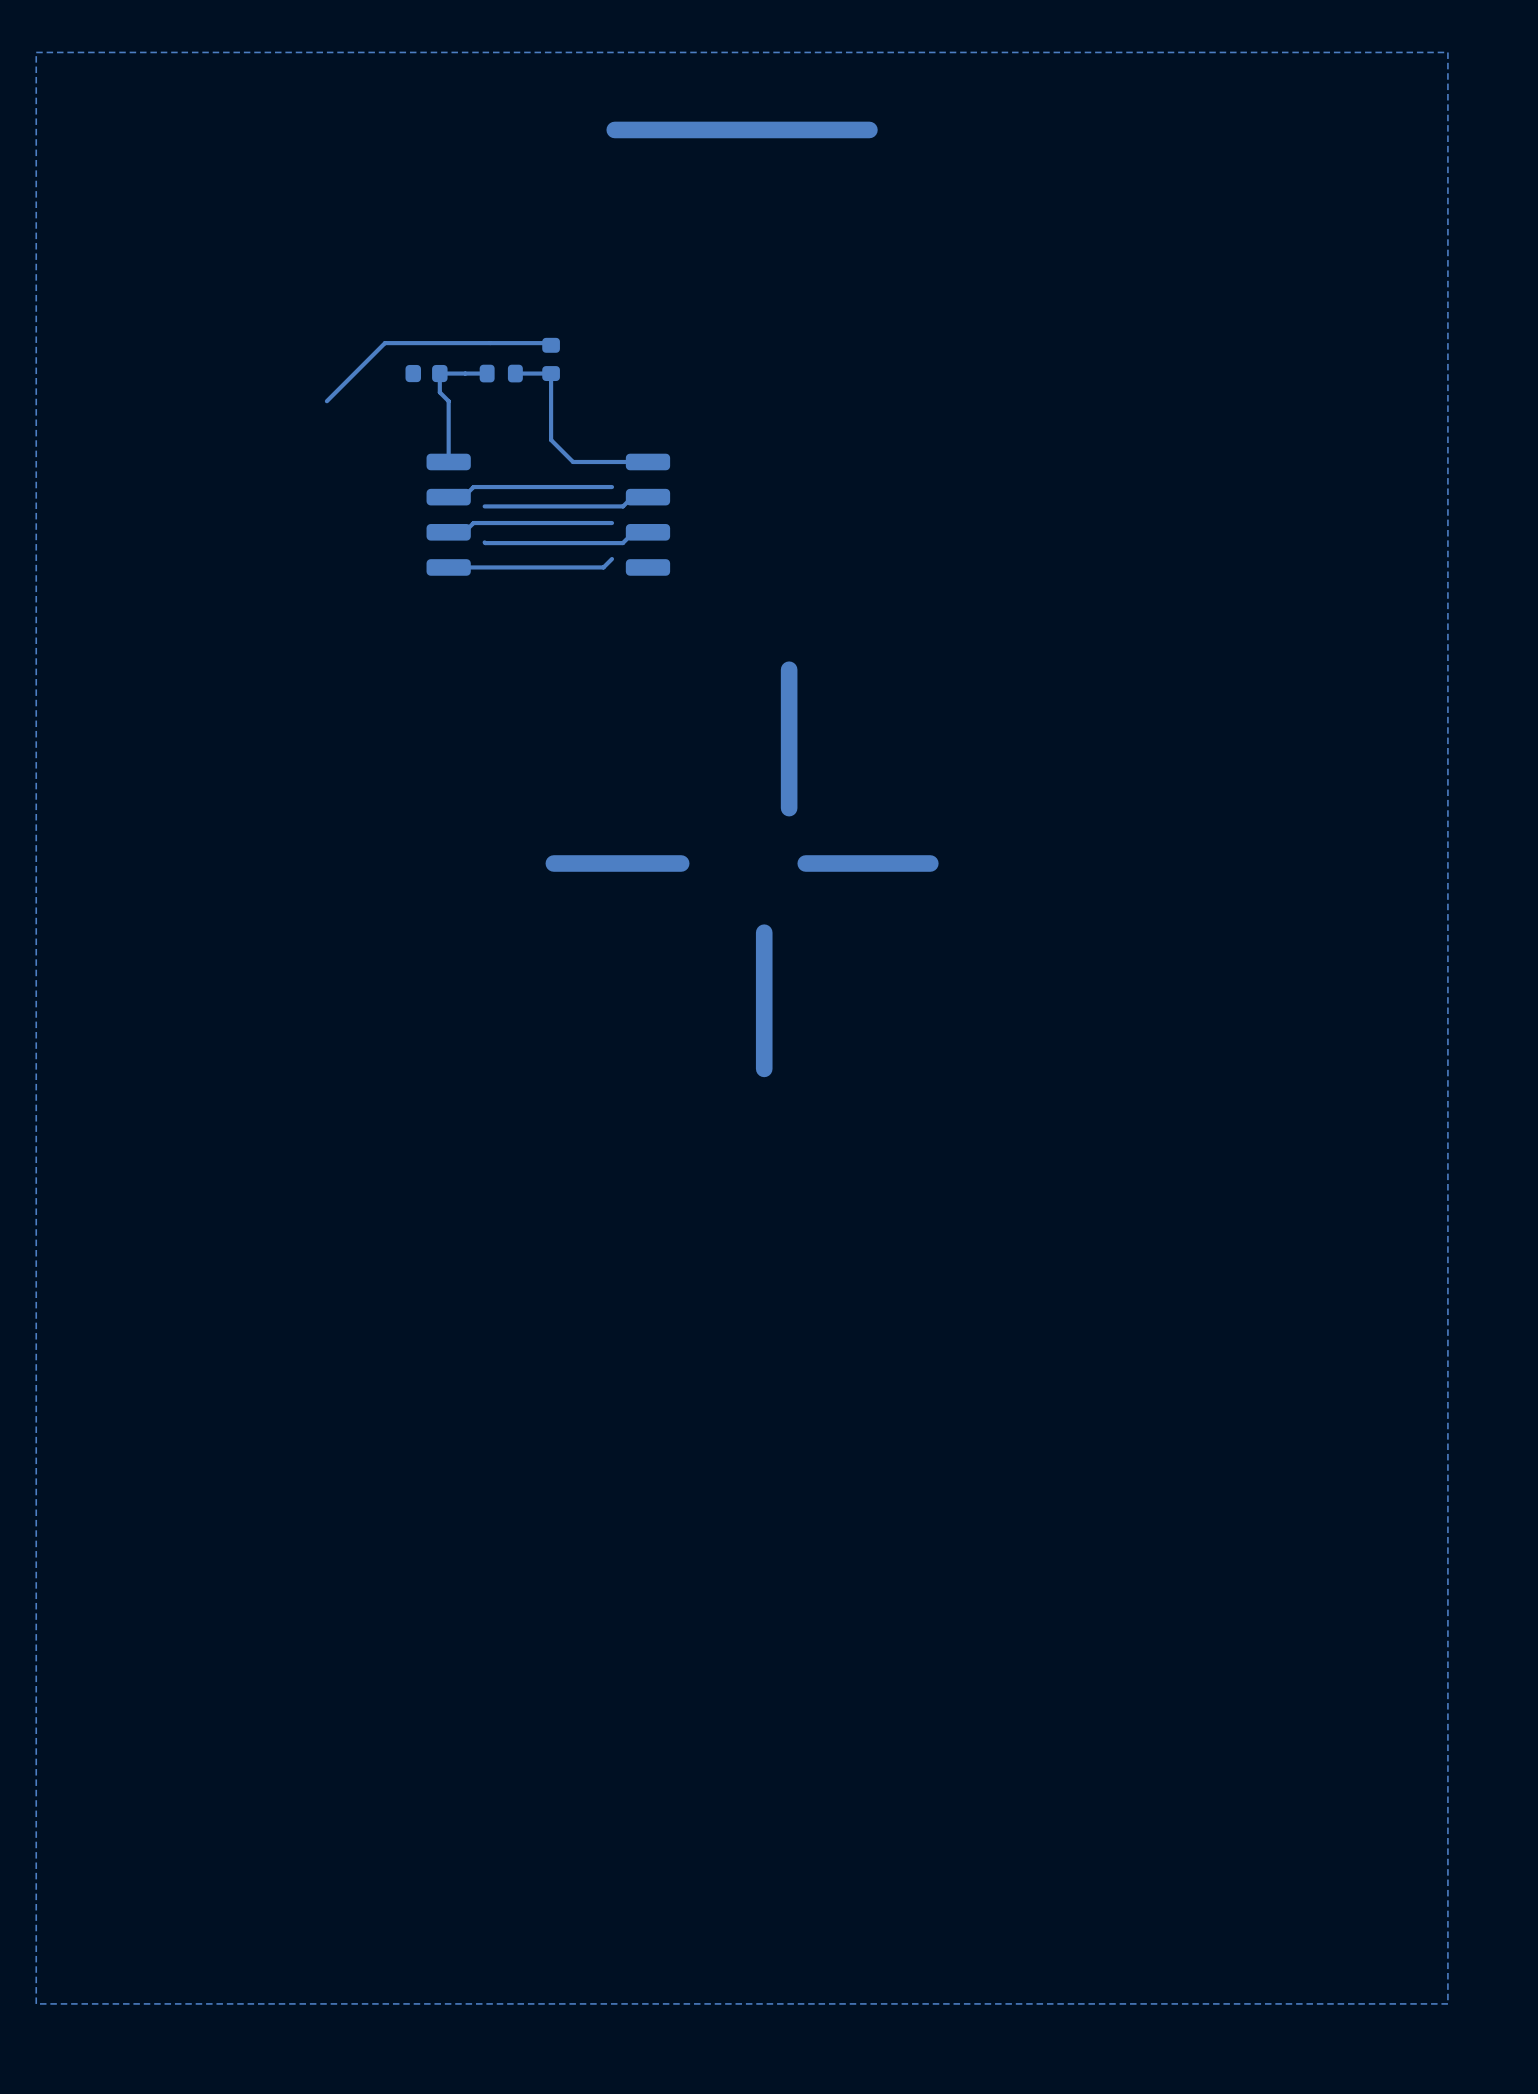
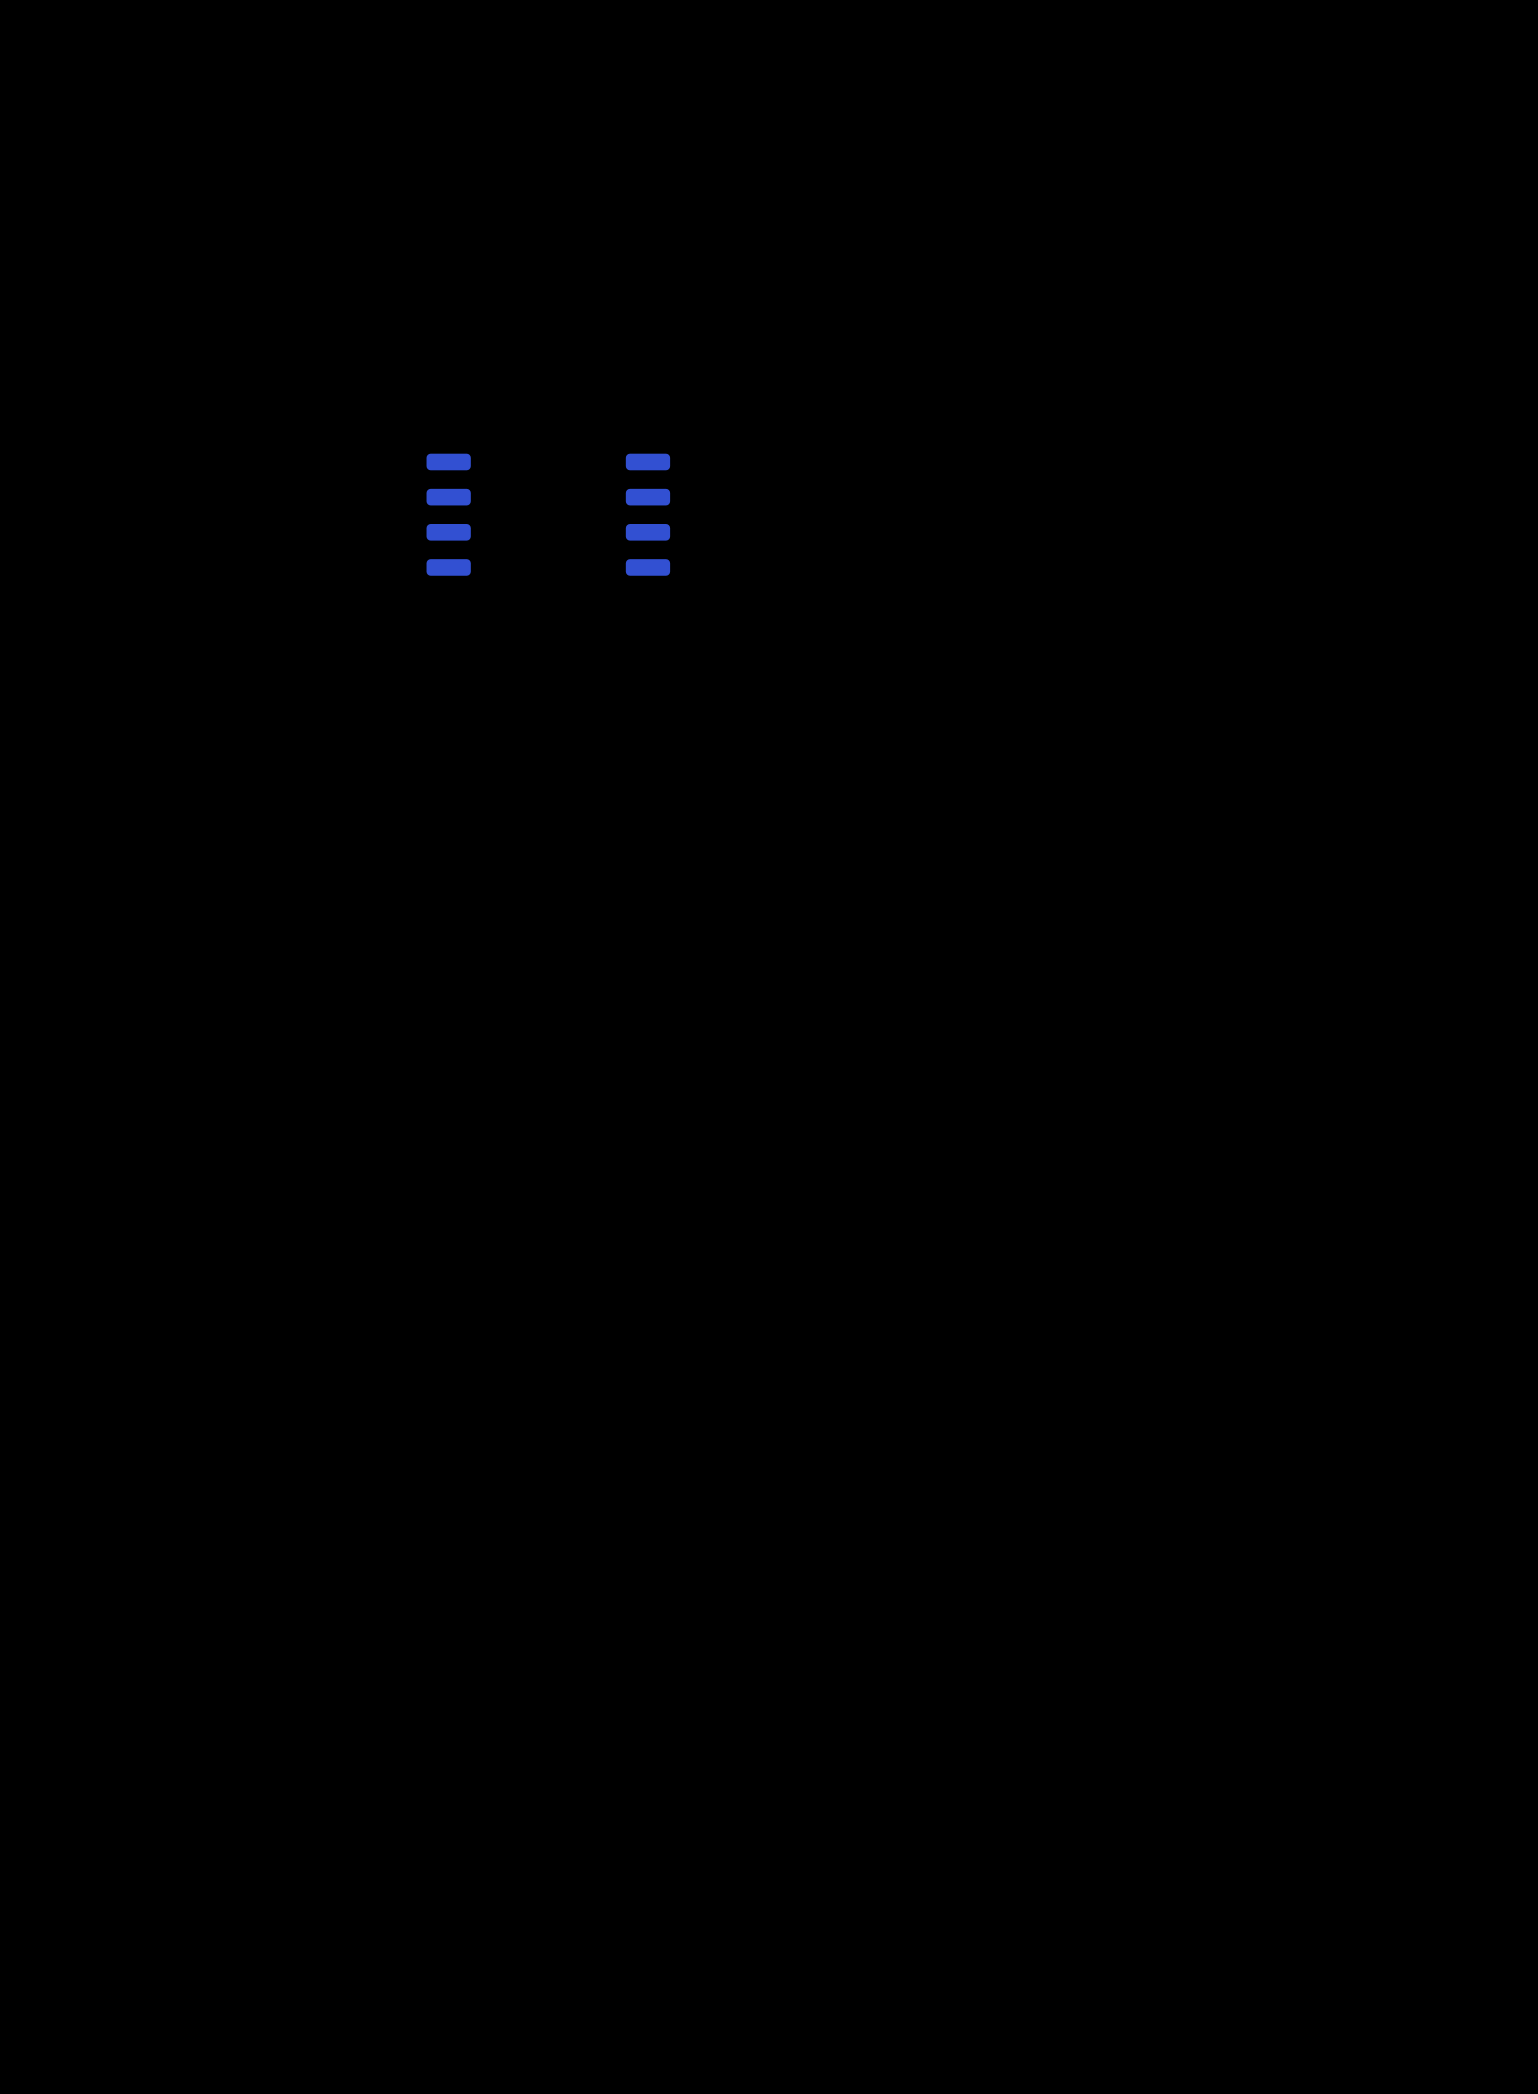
bottom zone outline: (36, 52) (36, 2003) (1447, 2003) (1447, 52) (36, 52) -> none
bottom track: (614, 129) (869, 129) -> none
bottom track: (551, 345) (548, 343) (385, 343) (326, 401) -> none
part: (551, 359) -> none
part: (426, 373) -> none
bottom track: (487, 373) (439, 373) (439, 392) (448, 401) (448, 461) -> none
part: (501, 373) -> none
bottom track: (515, 373) (551, 373) (551, 439) (573, 461) (647, 461) -> none
bottom track: (611, 487) (473, 487) (463, 497) (448, 497) -> none
bottom track: (647, 497) (631, 498) (623, 506) (484, 506) -> none
bottom track: (611, 523) (473, 523) (464, 532) (448, 532) -> none
bottom track: (647, 532) (633, 532) (622, 543) (484, 542) -> none
bottom track: (611, 559) (603, 567) (448, 567) -> none
bottom track: (789, 669) (789, 808) -> none
bottom track: (553, 863) (681, 863) -> none
bottom track: (805, 863) (930, 863) -> none
bottom track: (764, 932) (764, 1068) -> none

